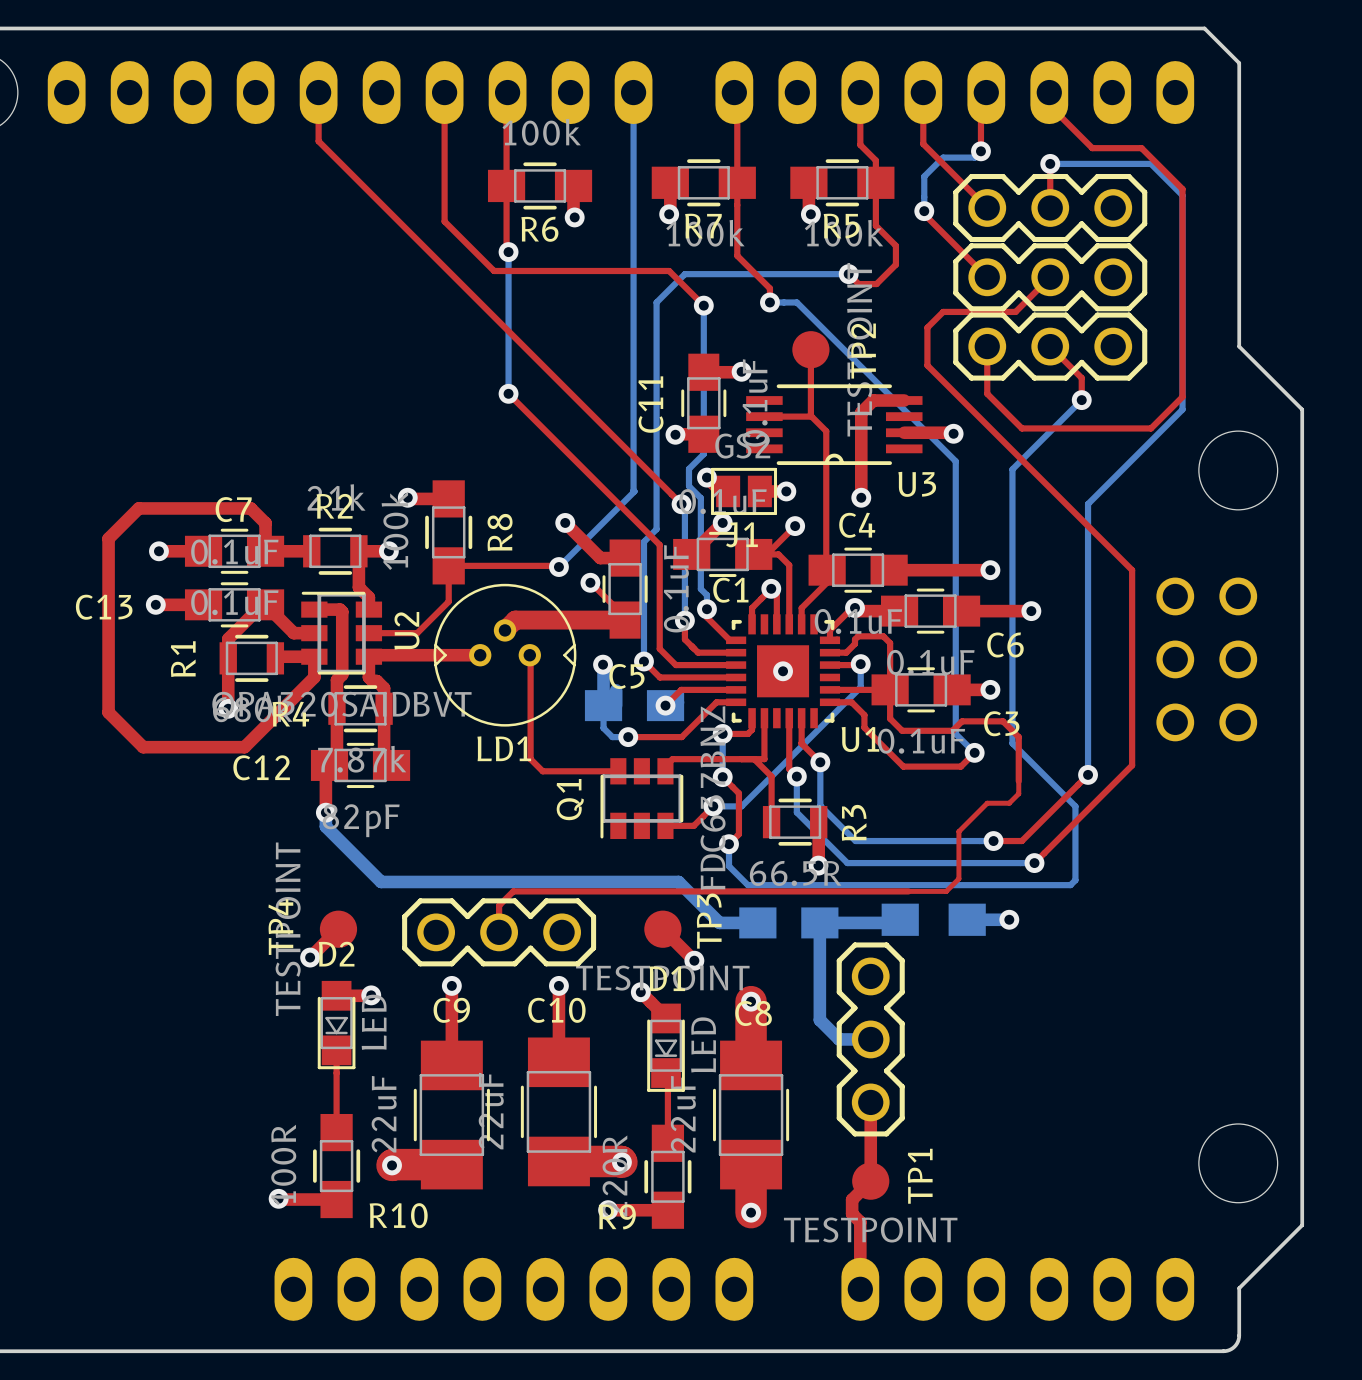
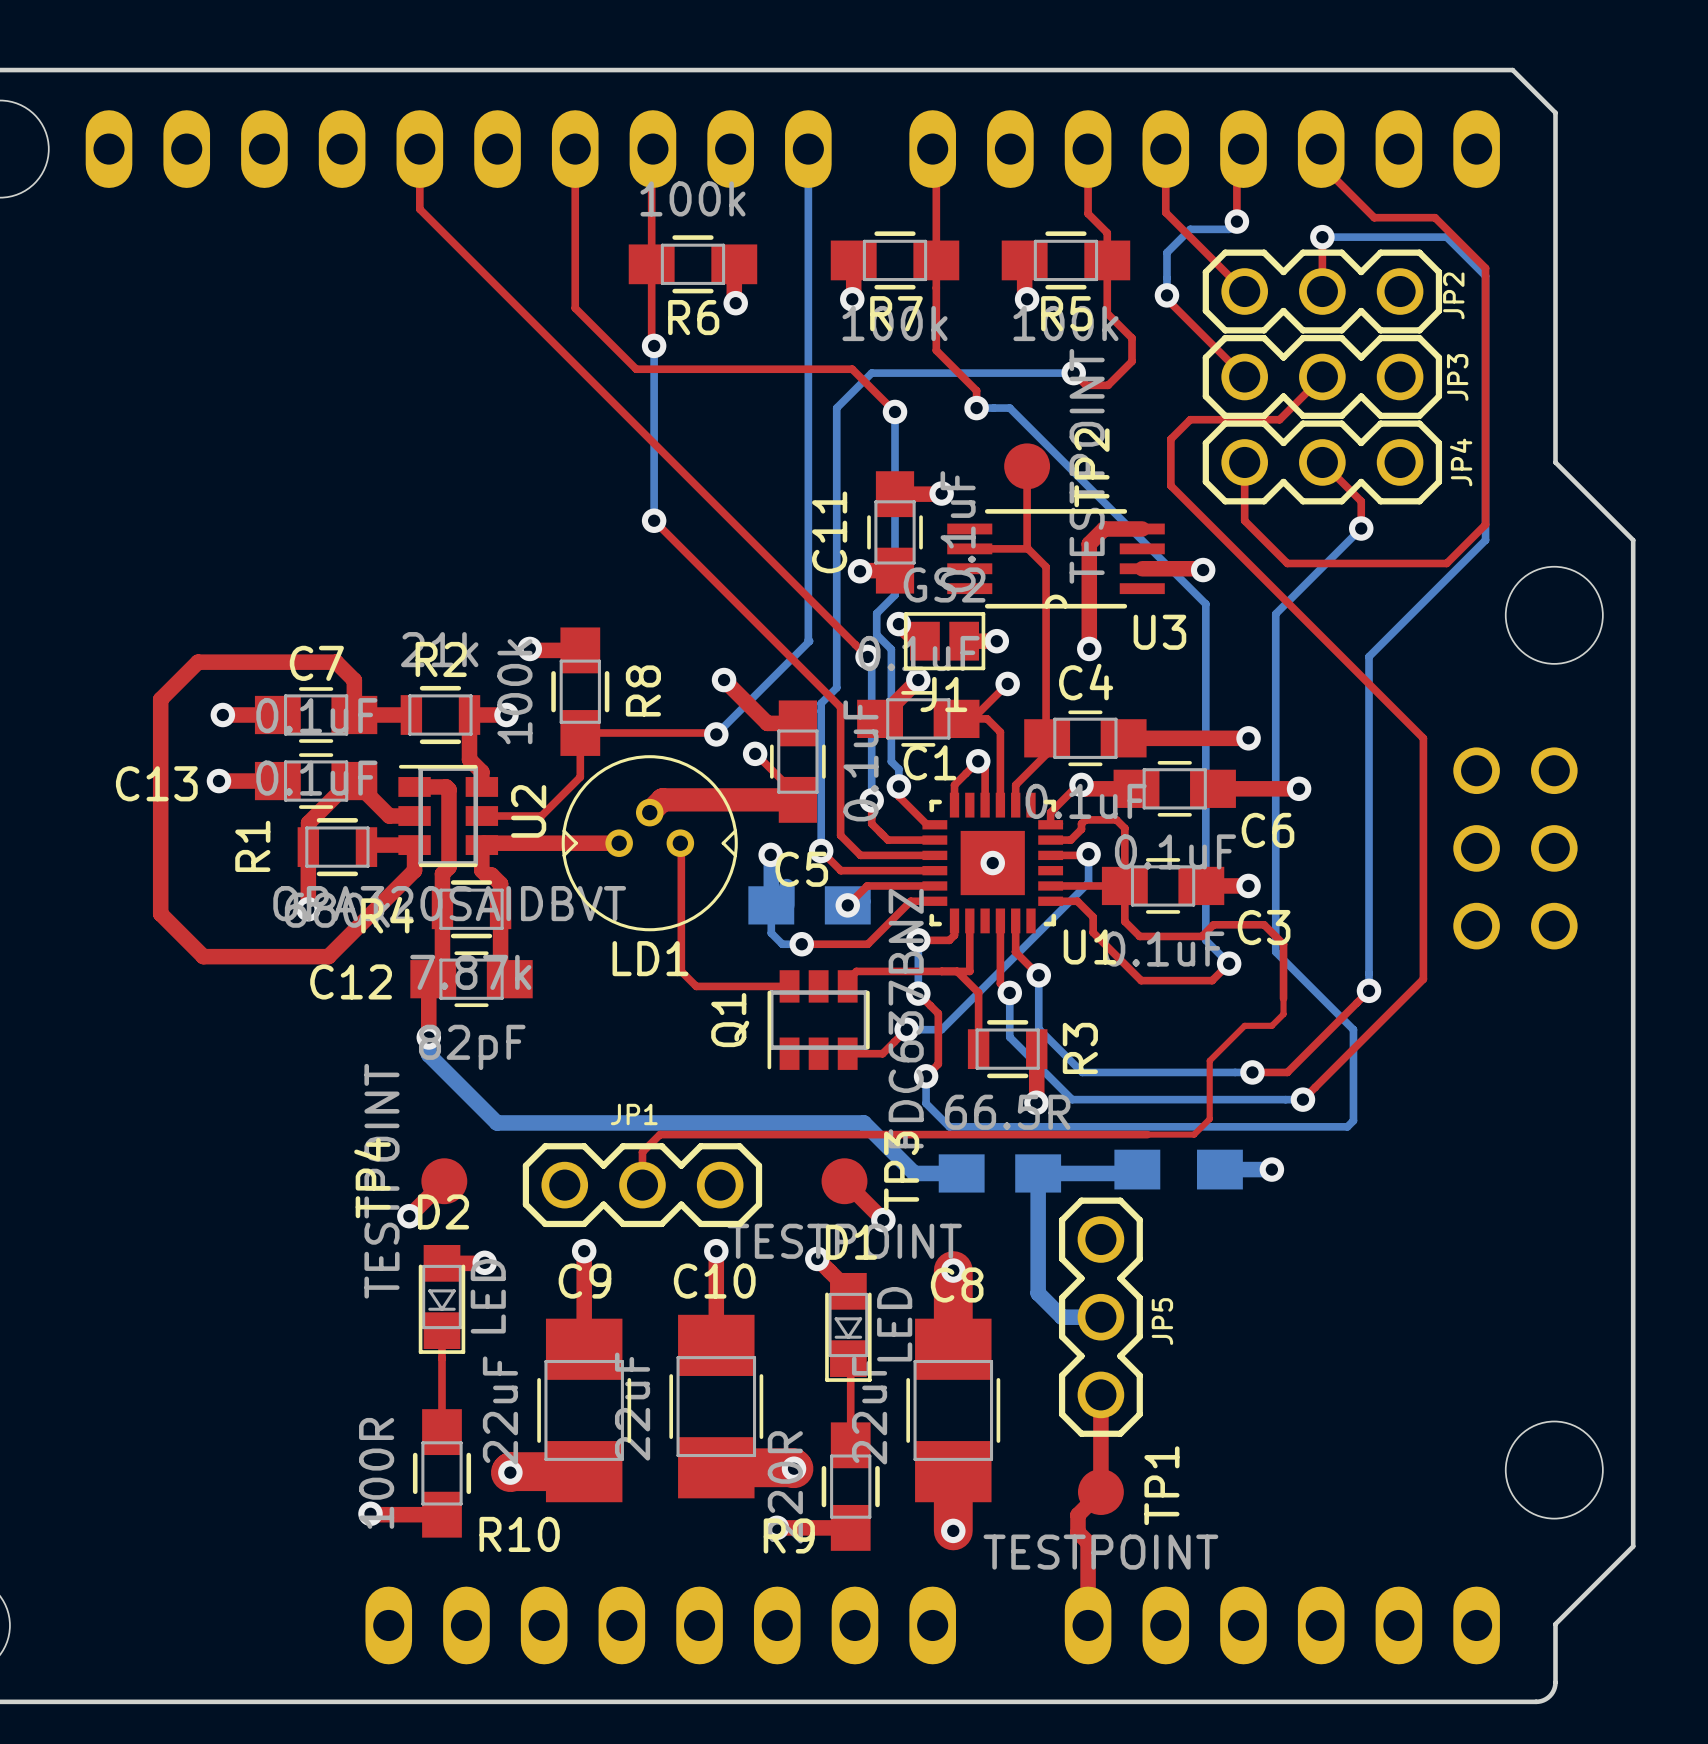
JP2 name: none -> JP2 (1453, 295)
JP3 name: none -> JP3 (1457, 377)
JP4 name: none -> JP4 (1461, 462)
JP1 name: none -> JP1 (634, 1114)
JP5 name: none -> JP5 (1162, 1321)

